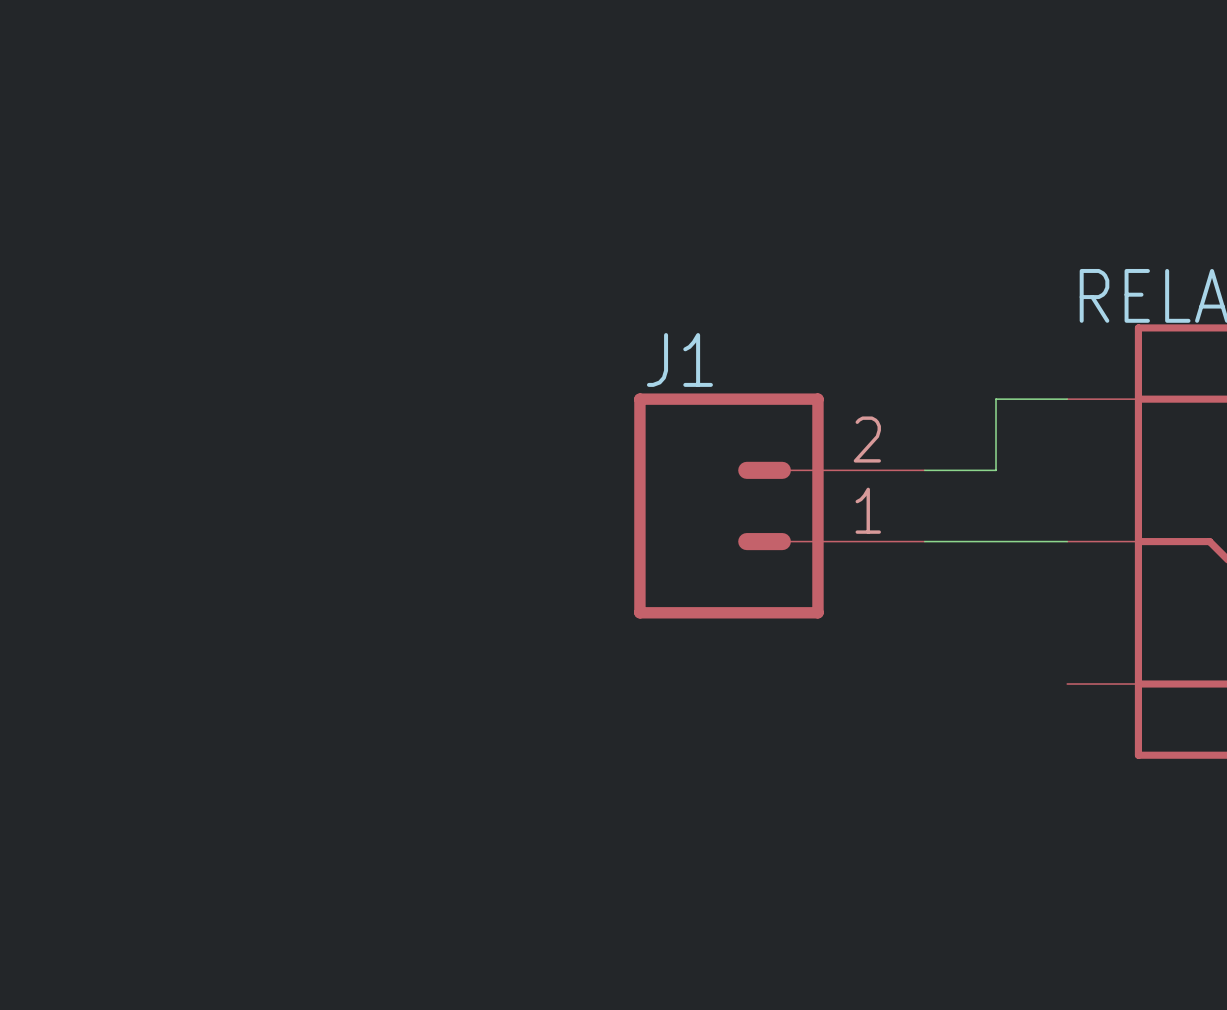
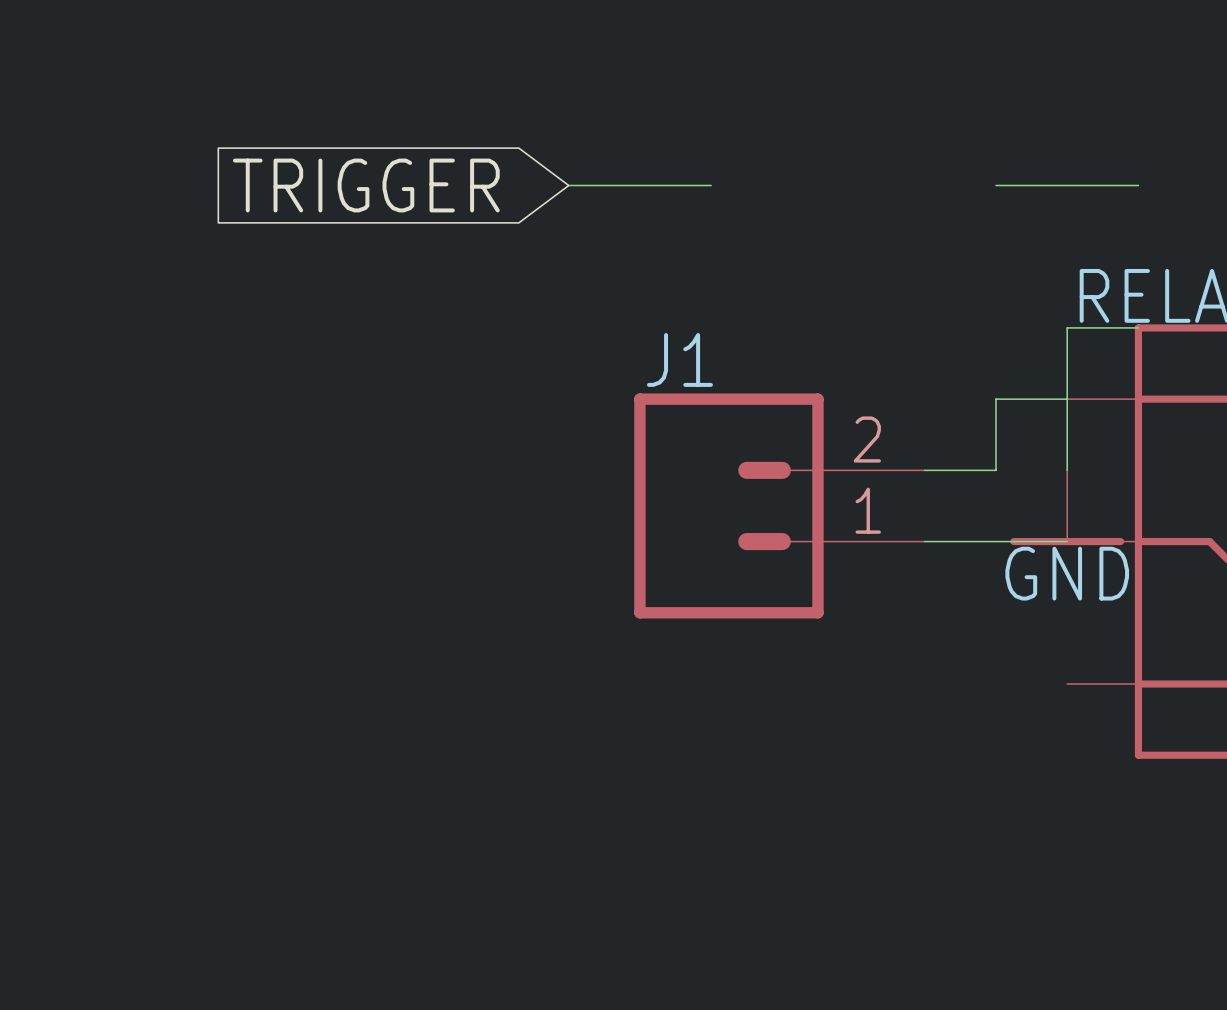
global label: none -> TRIGGER (366, 185)
wire: none -> (568, 185) (711, 185)
wire: none -> (996, 185) (1138, 185)
wire: none -> (1138, 327) (1067, 327) (1067, 470)
power symbol: none -> GND (1067, 507)

